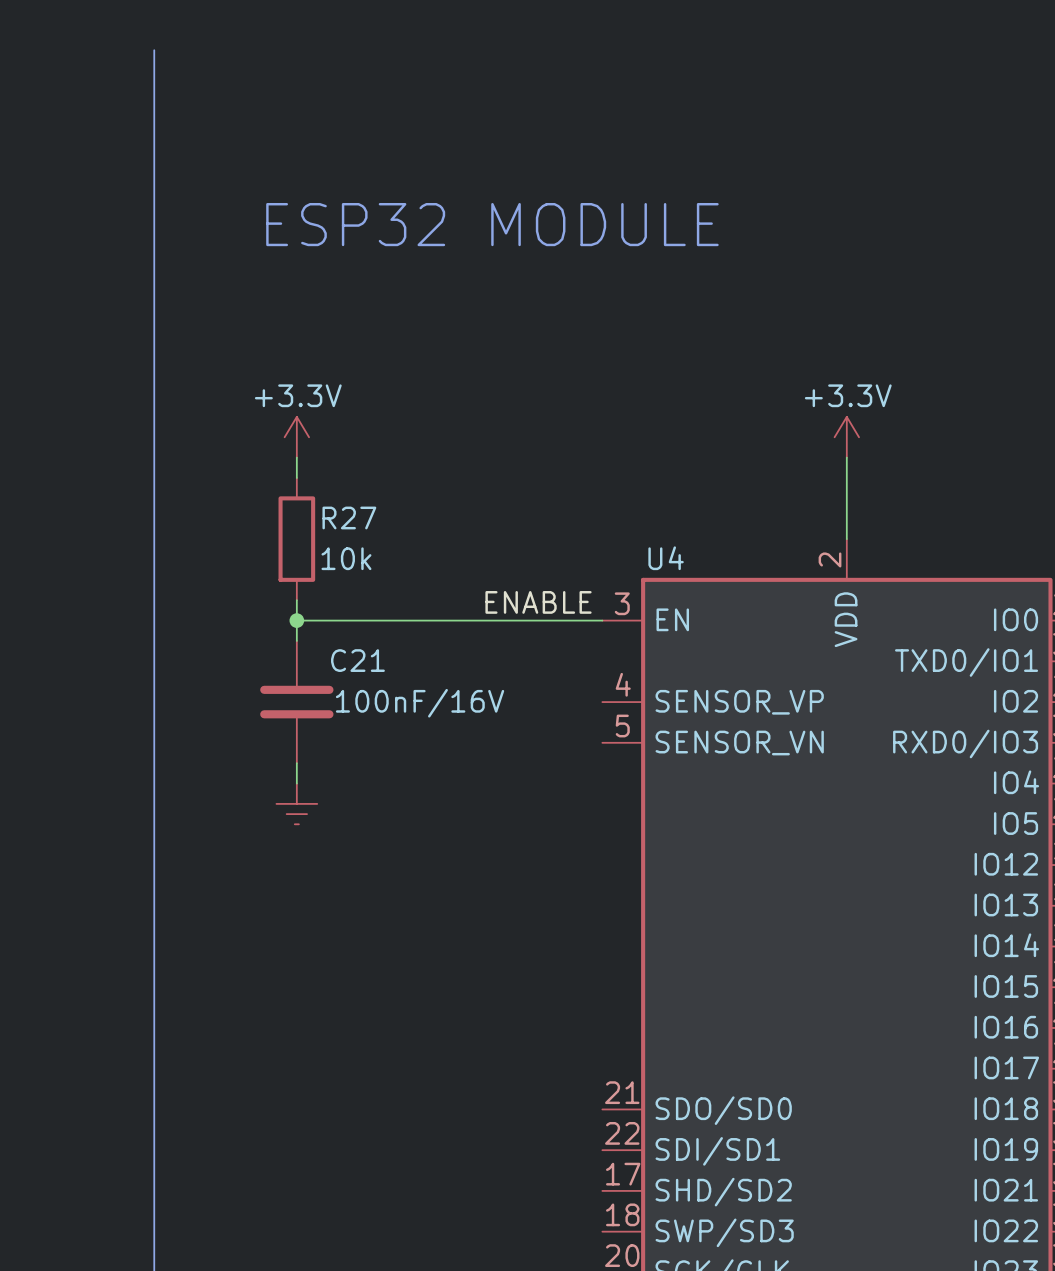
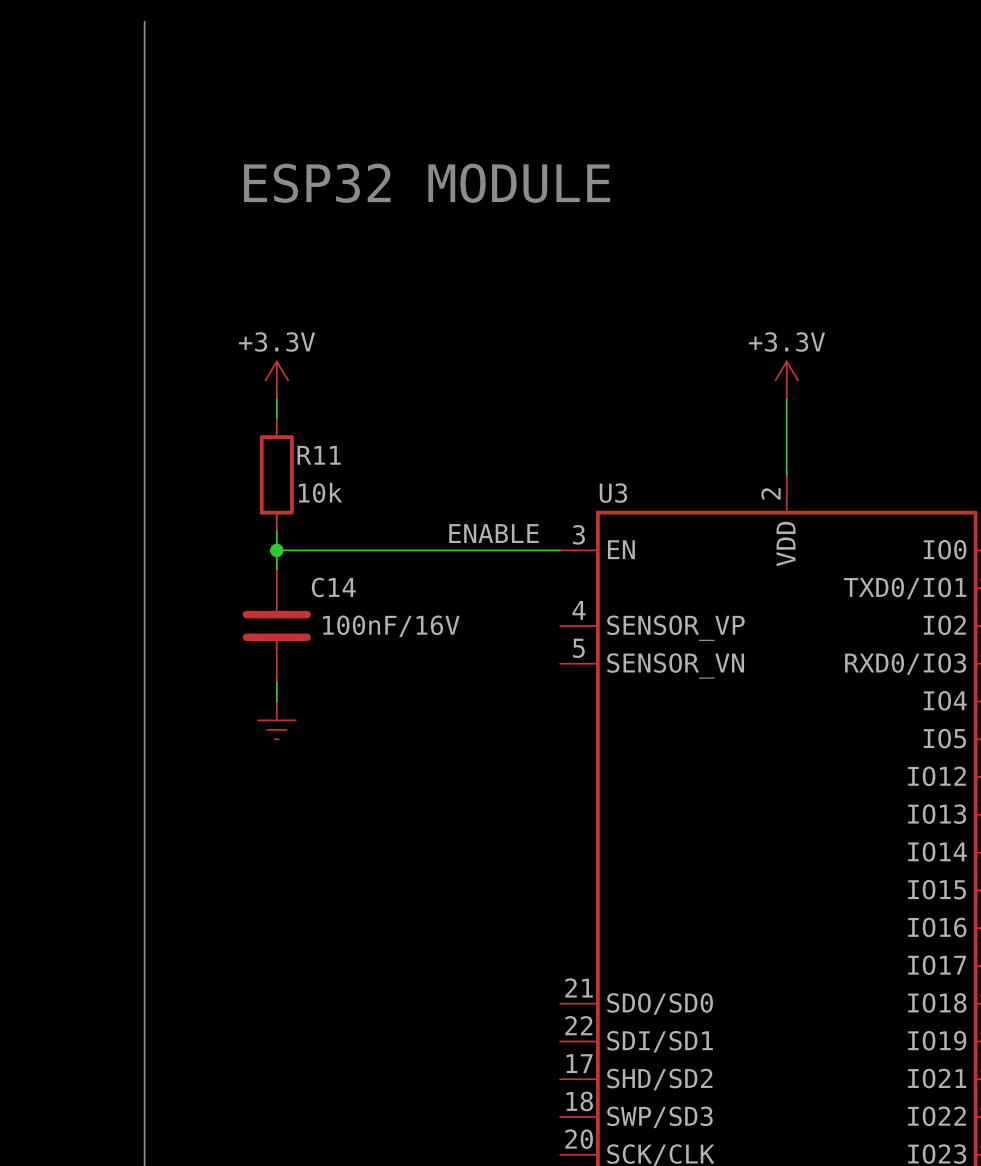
R27 name: R27 (349, 517) -> R11 (319, 455)
U4 name: U4 (666, 558) -> U3 (613, 493)
C21 name: C21 (357, 660) -> C14 (333, 587)

